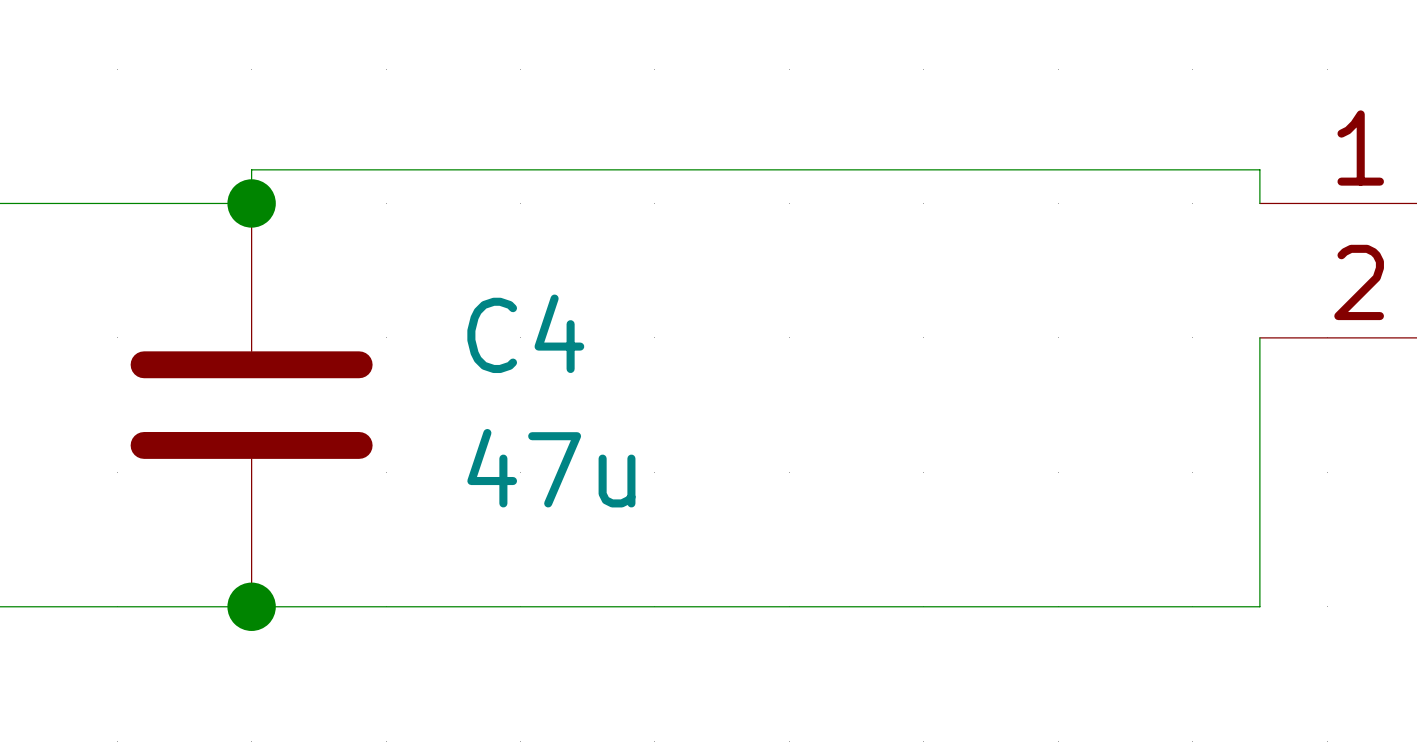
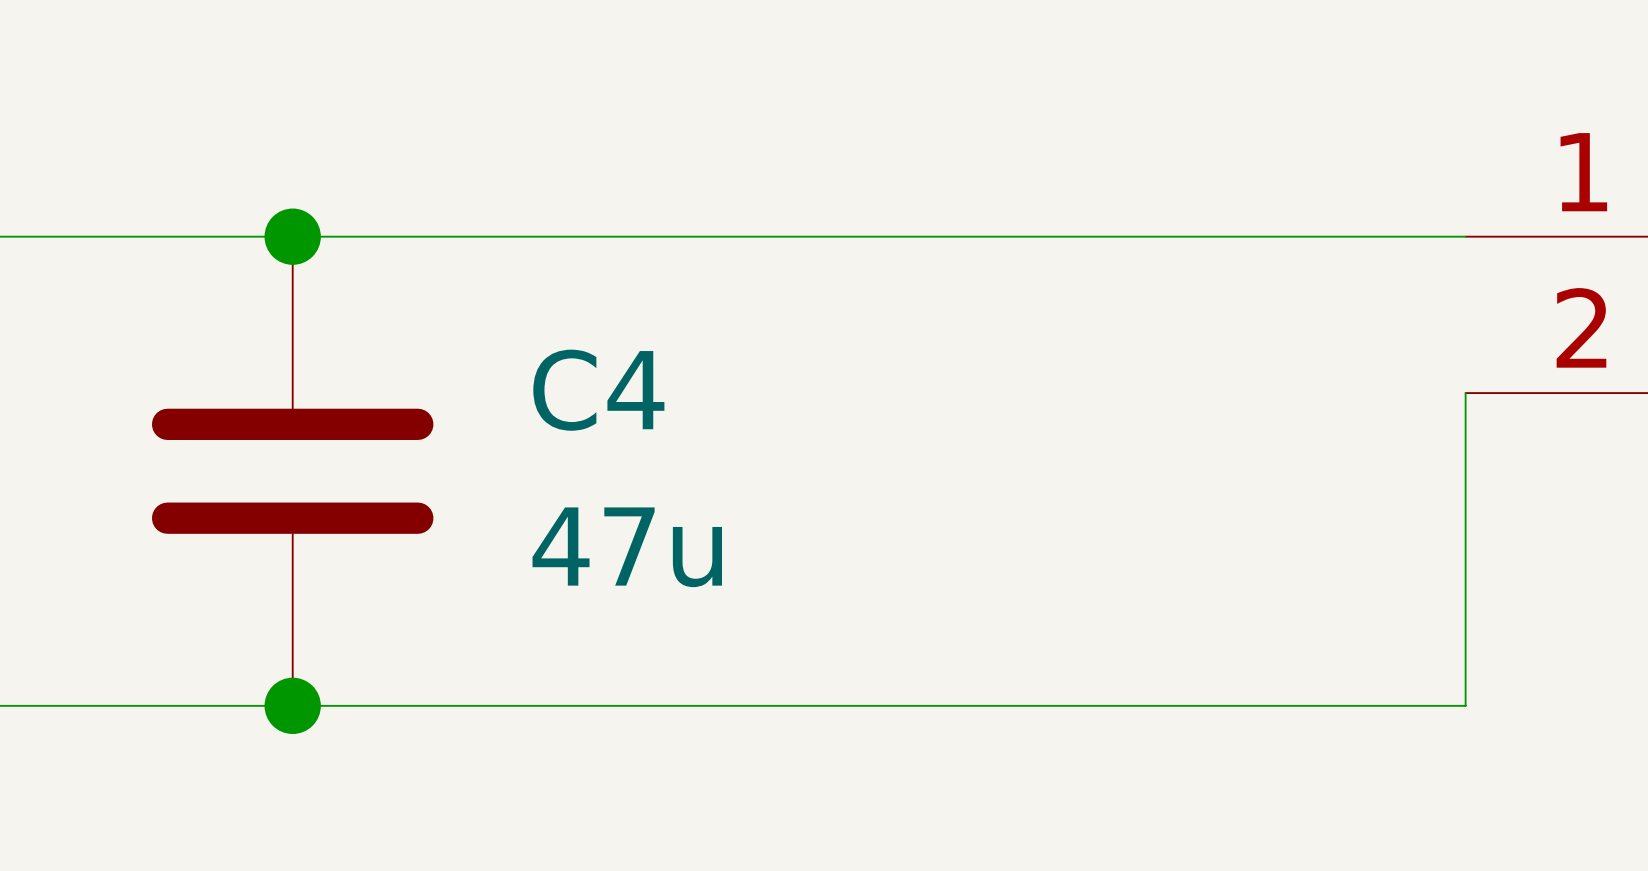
wire: (251, 203) (251, 169) (1259, 169) (1259, 203) -> (292, 236) (1465, 236)

